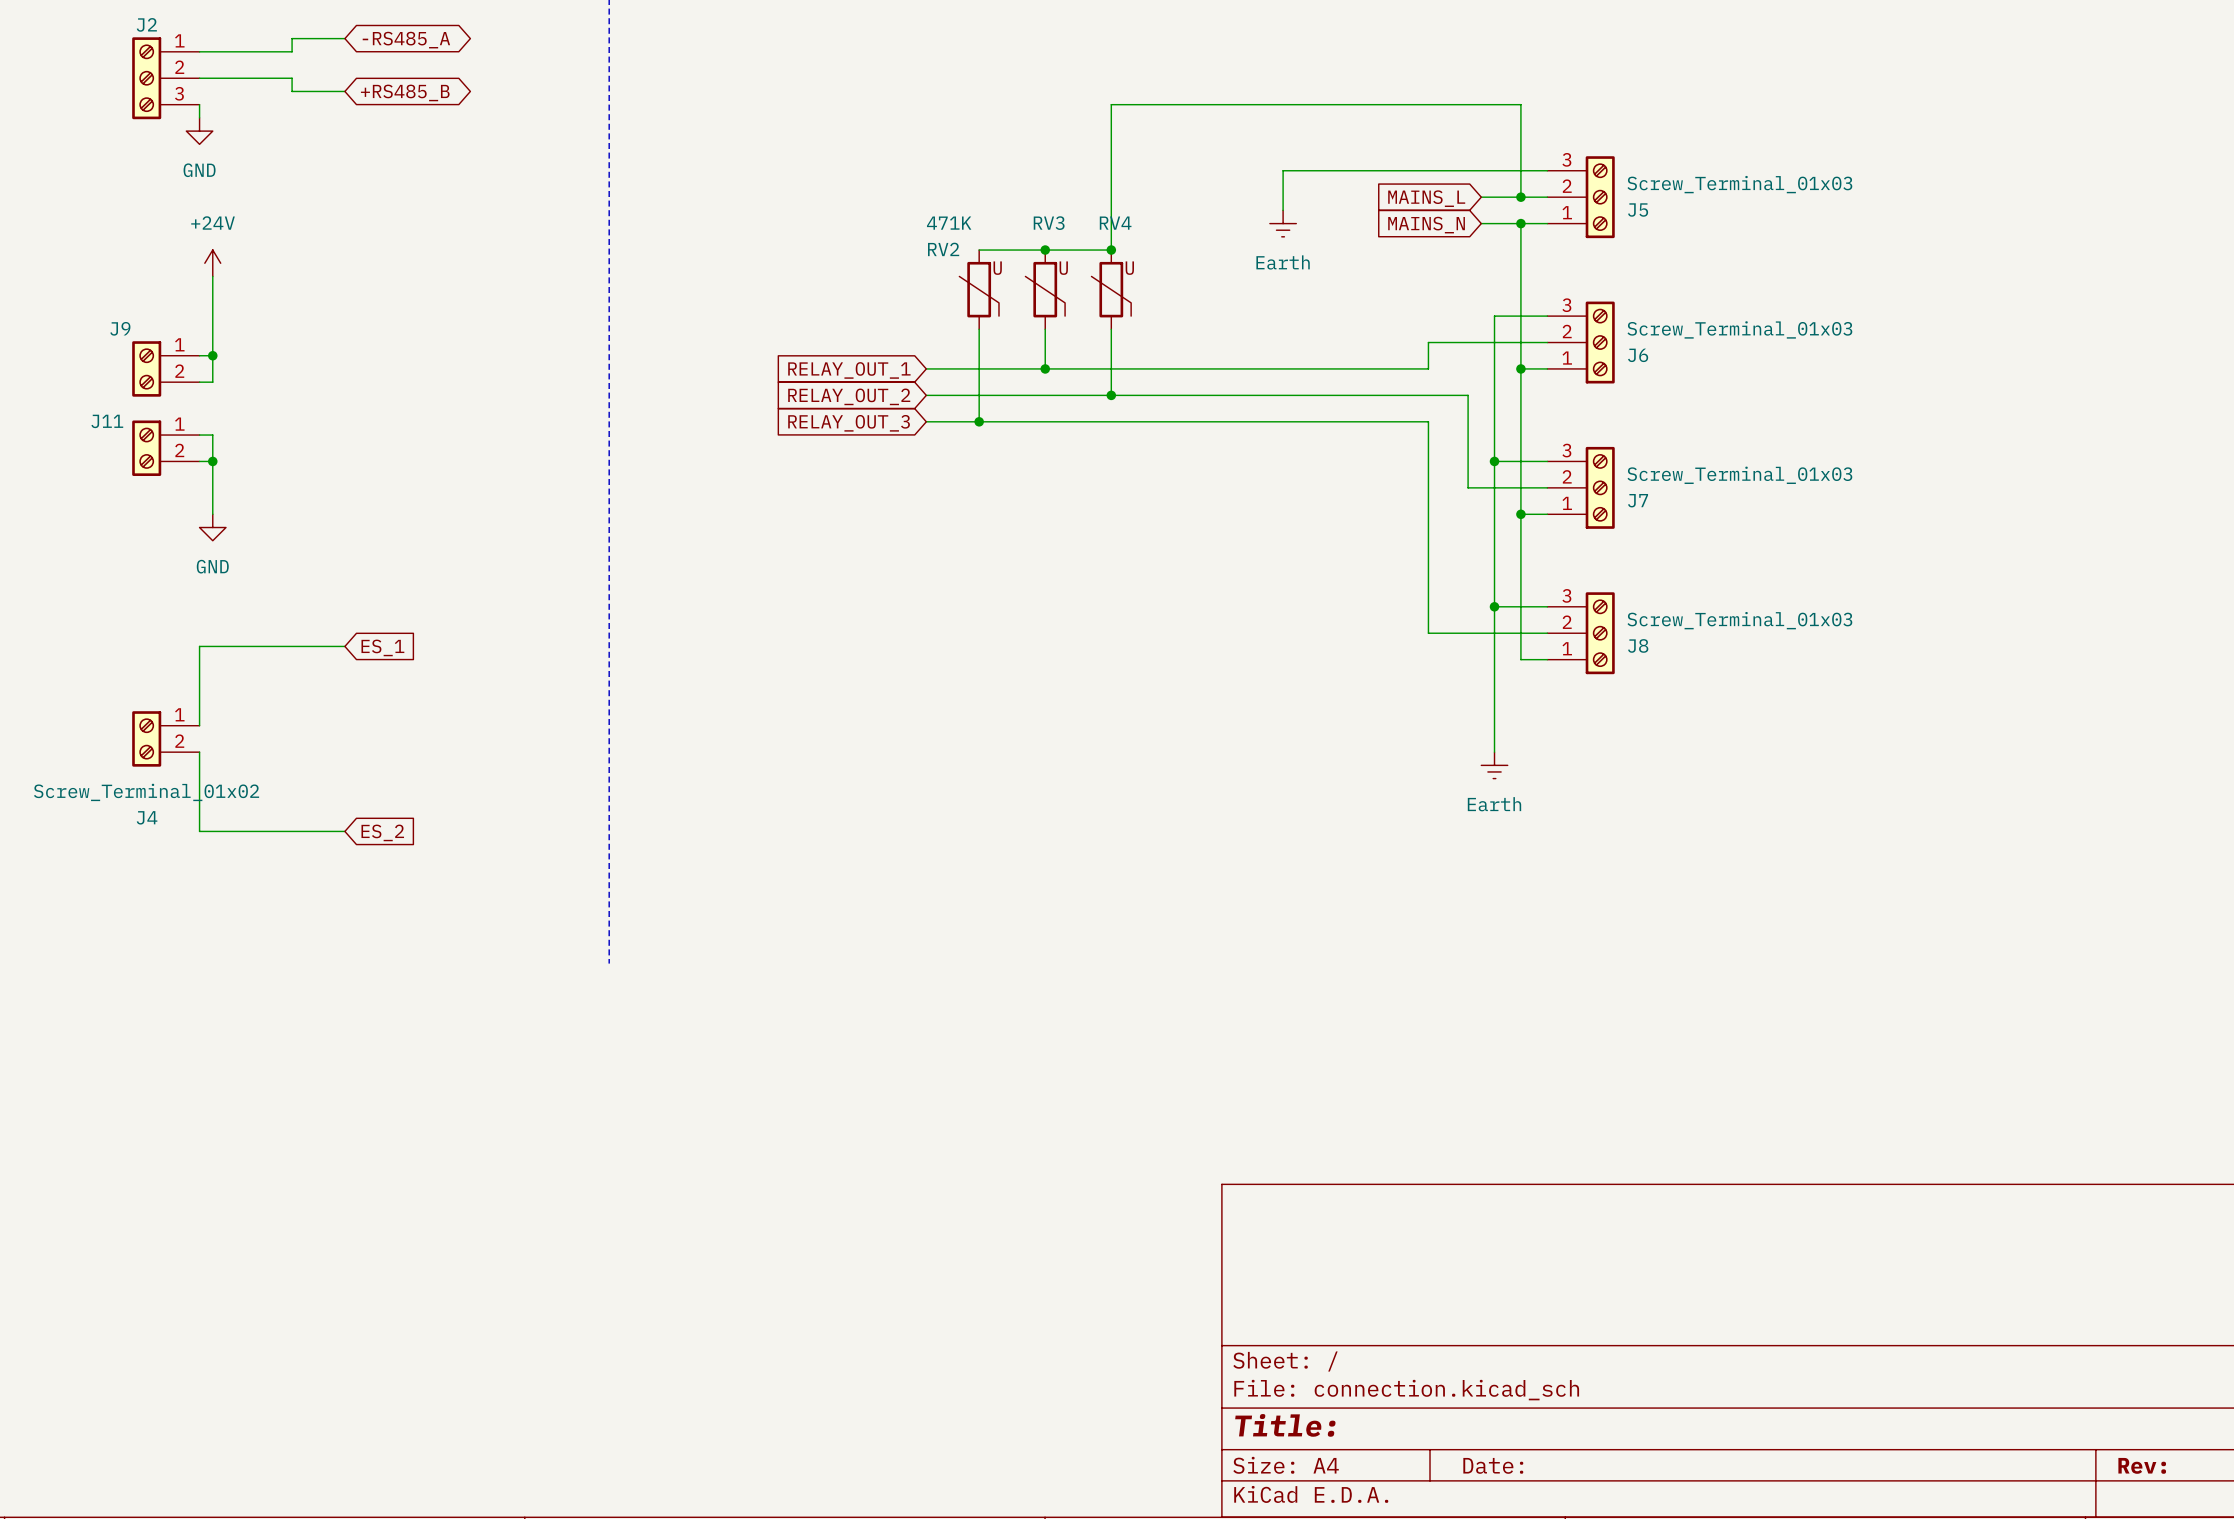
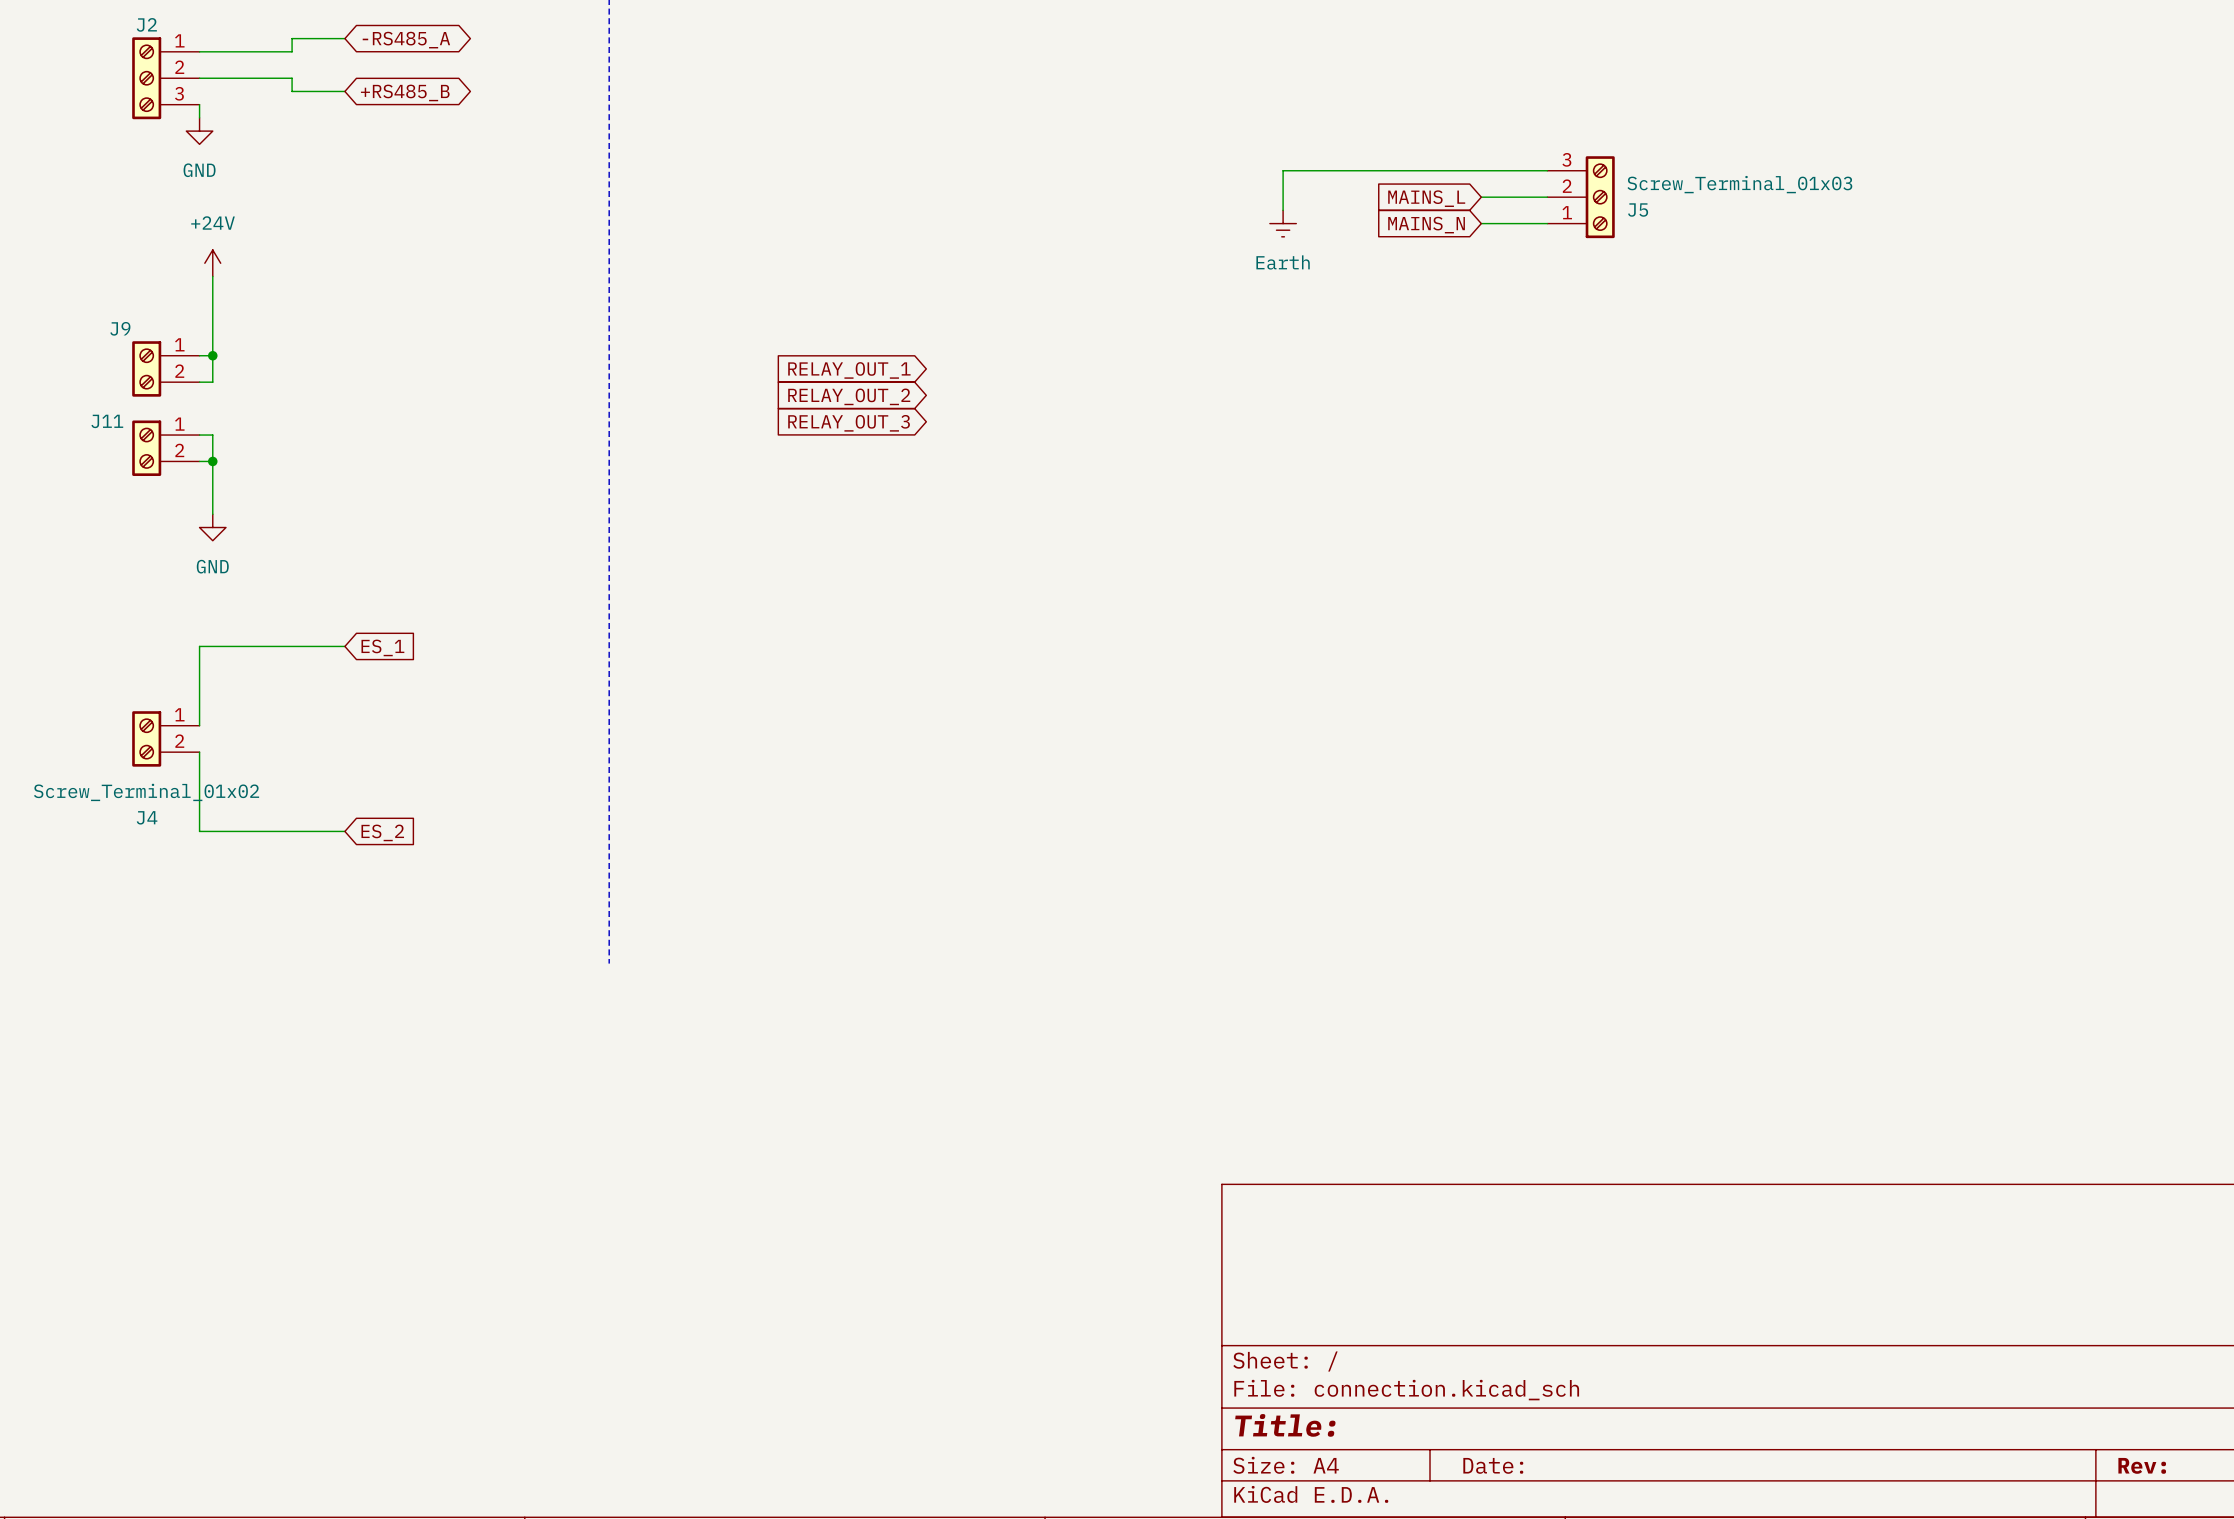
wire: (1520, 197) (1520, 104) (1111, 104) (1111, 250) (979, 250) -> none
junction: (1520, 197) -> none
wire: (1520, 223) (1520, 659) (1547, 659) -> none
junction: (1520, 223) -> none
junction: (1045, 250) -> none
junction: (1111, 250) -> none
RV2: 471K (979, 289) -> none
RV3: (1045, 289) -> none
RV4: (1111, 289) -> none
wire: (1547, 316) (1494, 316) (1494, 752) -> none
wire: (979, 329) (979, 421) -> none
wire: (1045, 329) (1045, 368) -> none
wire: (1111, 329) (1111, 395) -> none
wire: (1547, 342) (1428, 342) (1428, 368) (926, 368) -> none
J6: Screw_Terminal_01x03 (1581, 342) -> none
junction: (1045, 368) -> none
wire: (1520, 368) (1547, 368) -> none
junction: (1520, 368) -> none
wire: (926, 395) (1468, 395) (1468, 487) (1547, 487) -> none
junction: (1111, 395) -> none
wire: (926, 421) (1428, 421) (1428, 633) (1547, 633) -> none
junction: (979, 421) -> none
wire: (1494, 461) (1547, 461) -> none
junction: (1494, 461) -> none
J7: Screw_Terminal_01x03 (1581, 487) -> none
wire: (1520, 514) (1547, 514) -> none
junction: (1520, 514) -> none
wire: (1494, 606) (1547, 606) -> none
junction: (1494, 606) -> none
J8: Screw_Terminal_01x03 (1581, 633) -> none
power symbol: Earth (1494, 765) -> none

